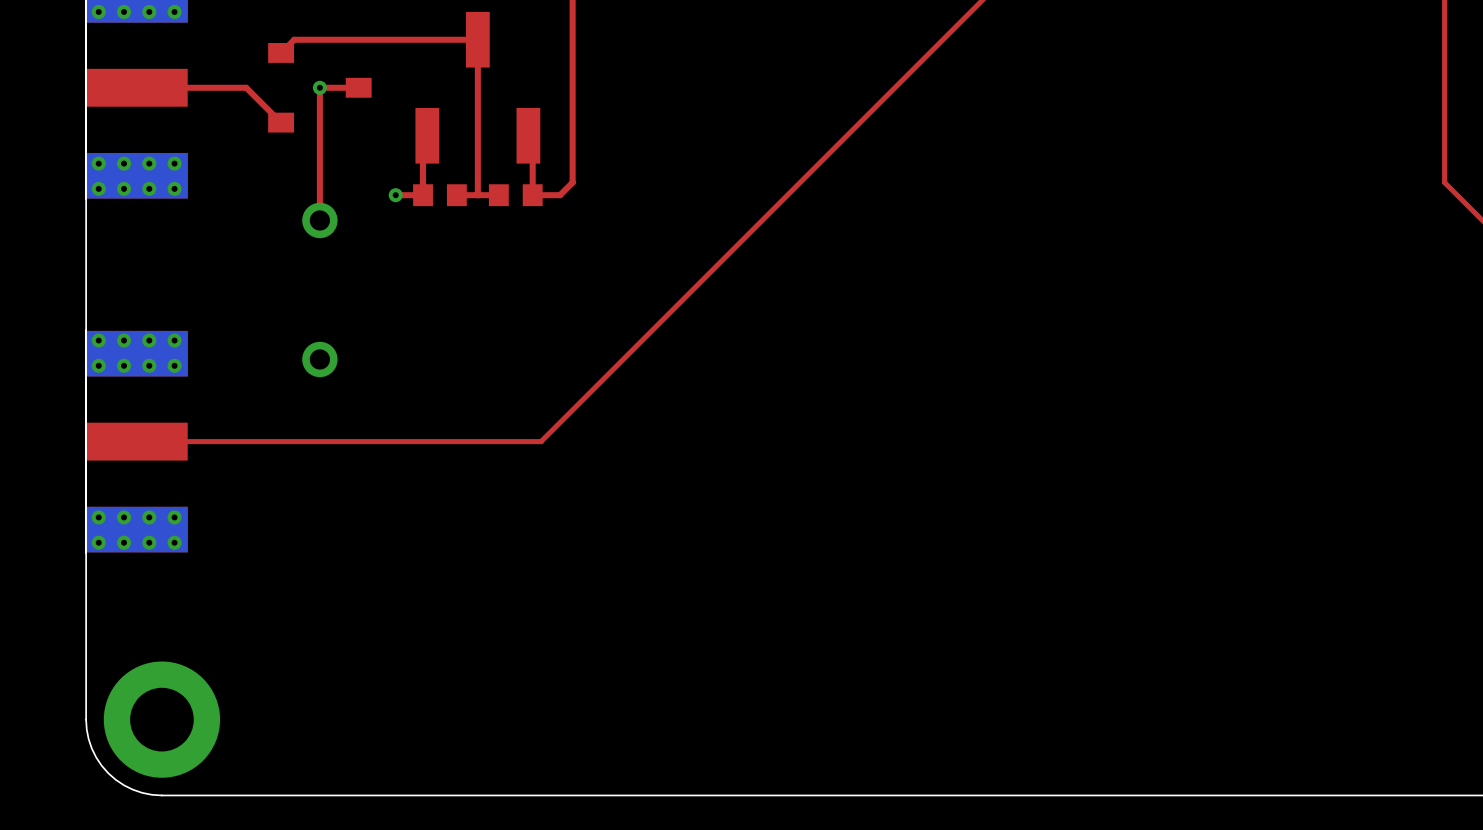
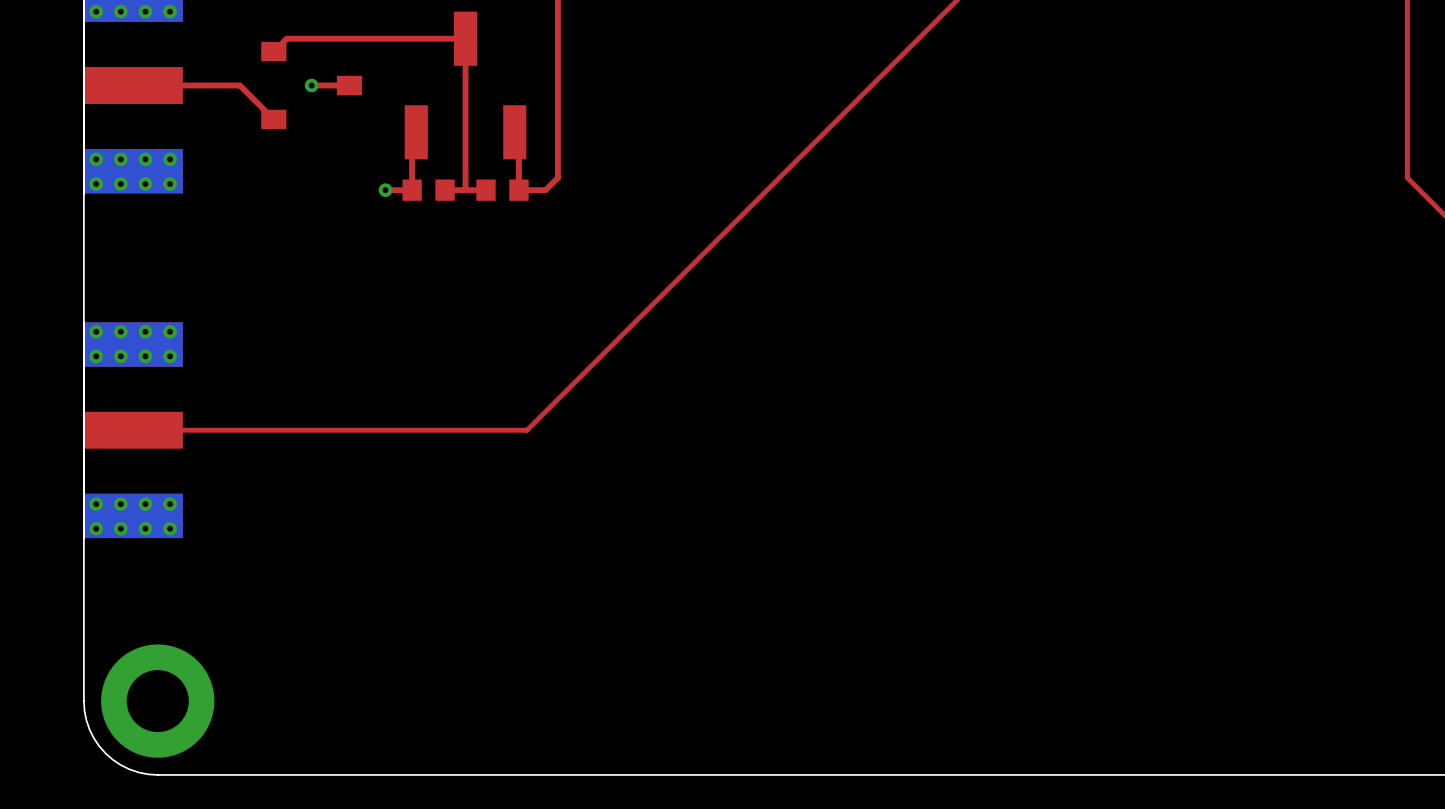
top track: (319, 87) (319, 220) -> none
part: (319, 220) -> none
part: (319, 359) -> none

